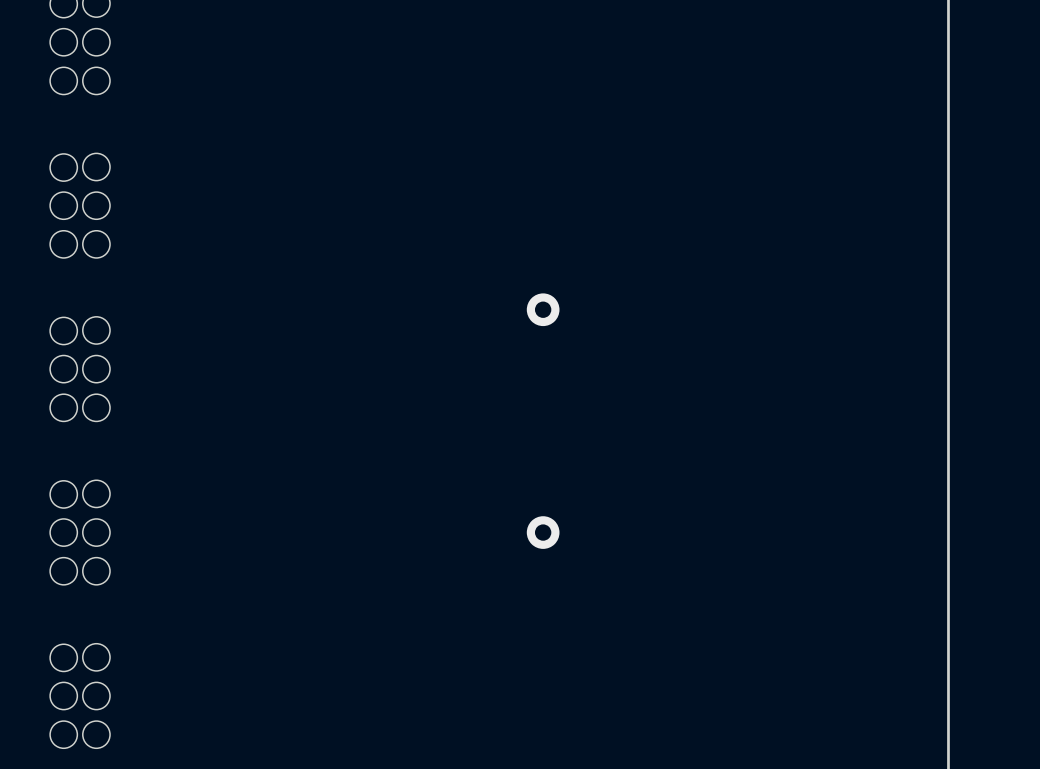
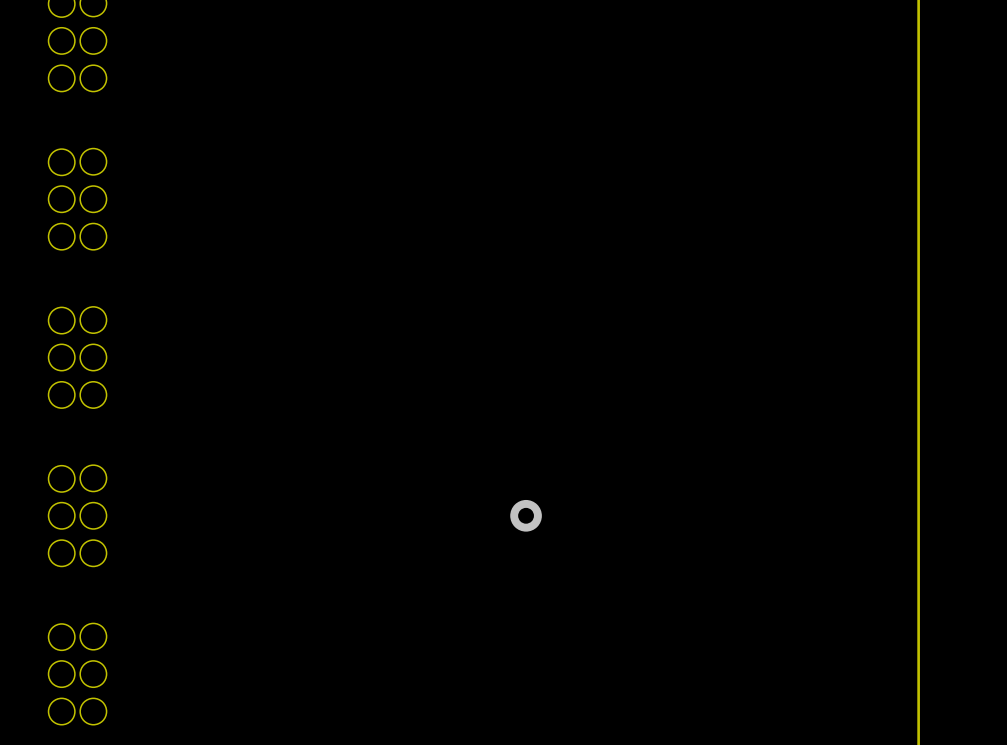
via: (543, 309) -> none

